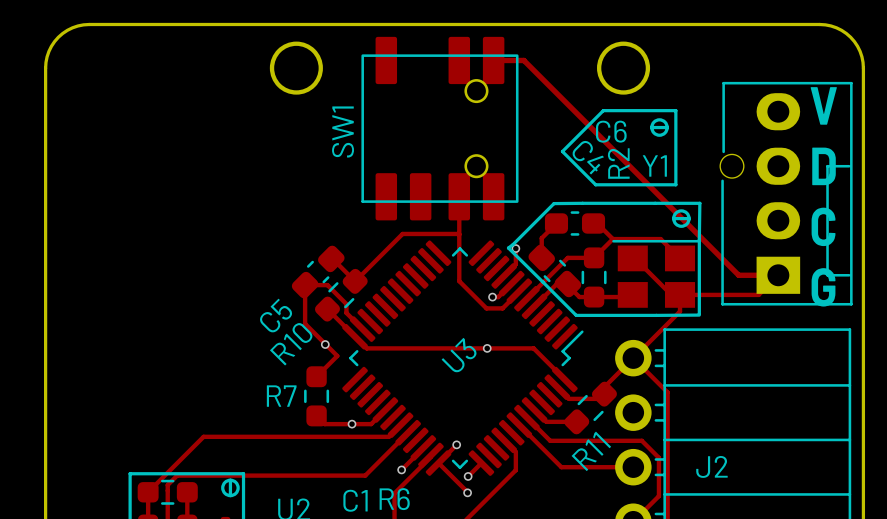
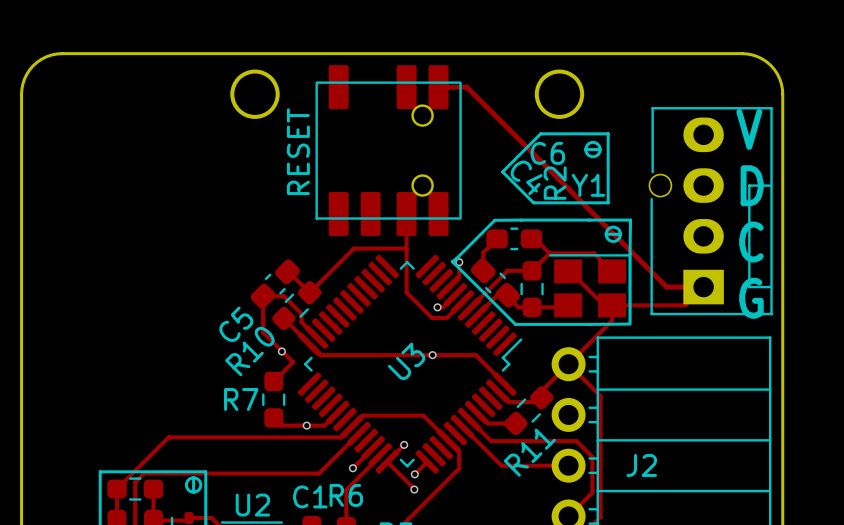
SW1 name: SW1 (343, 131) -> RESET (298, 151)
track: none -> (351, 426) (362, 415) (423, 415) (448, 440)

